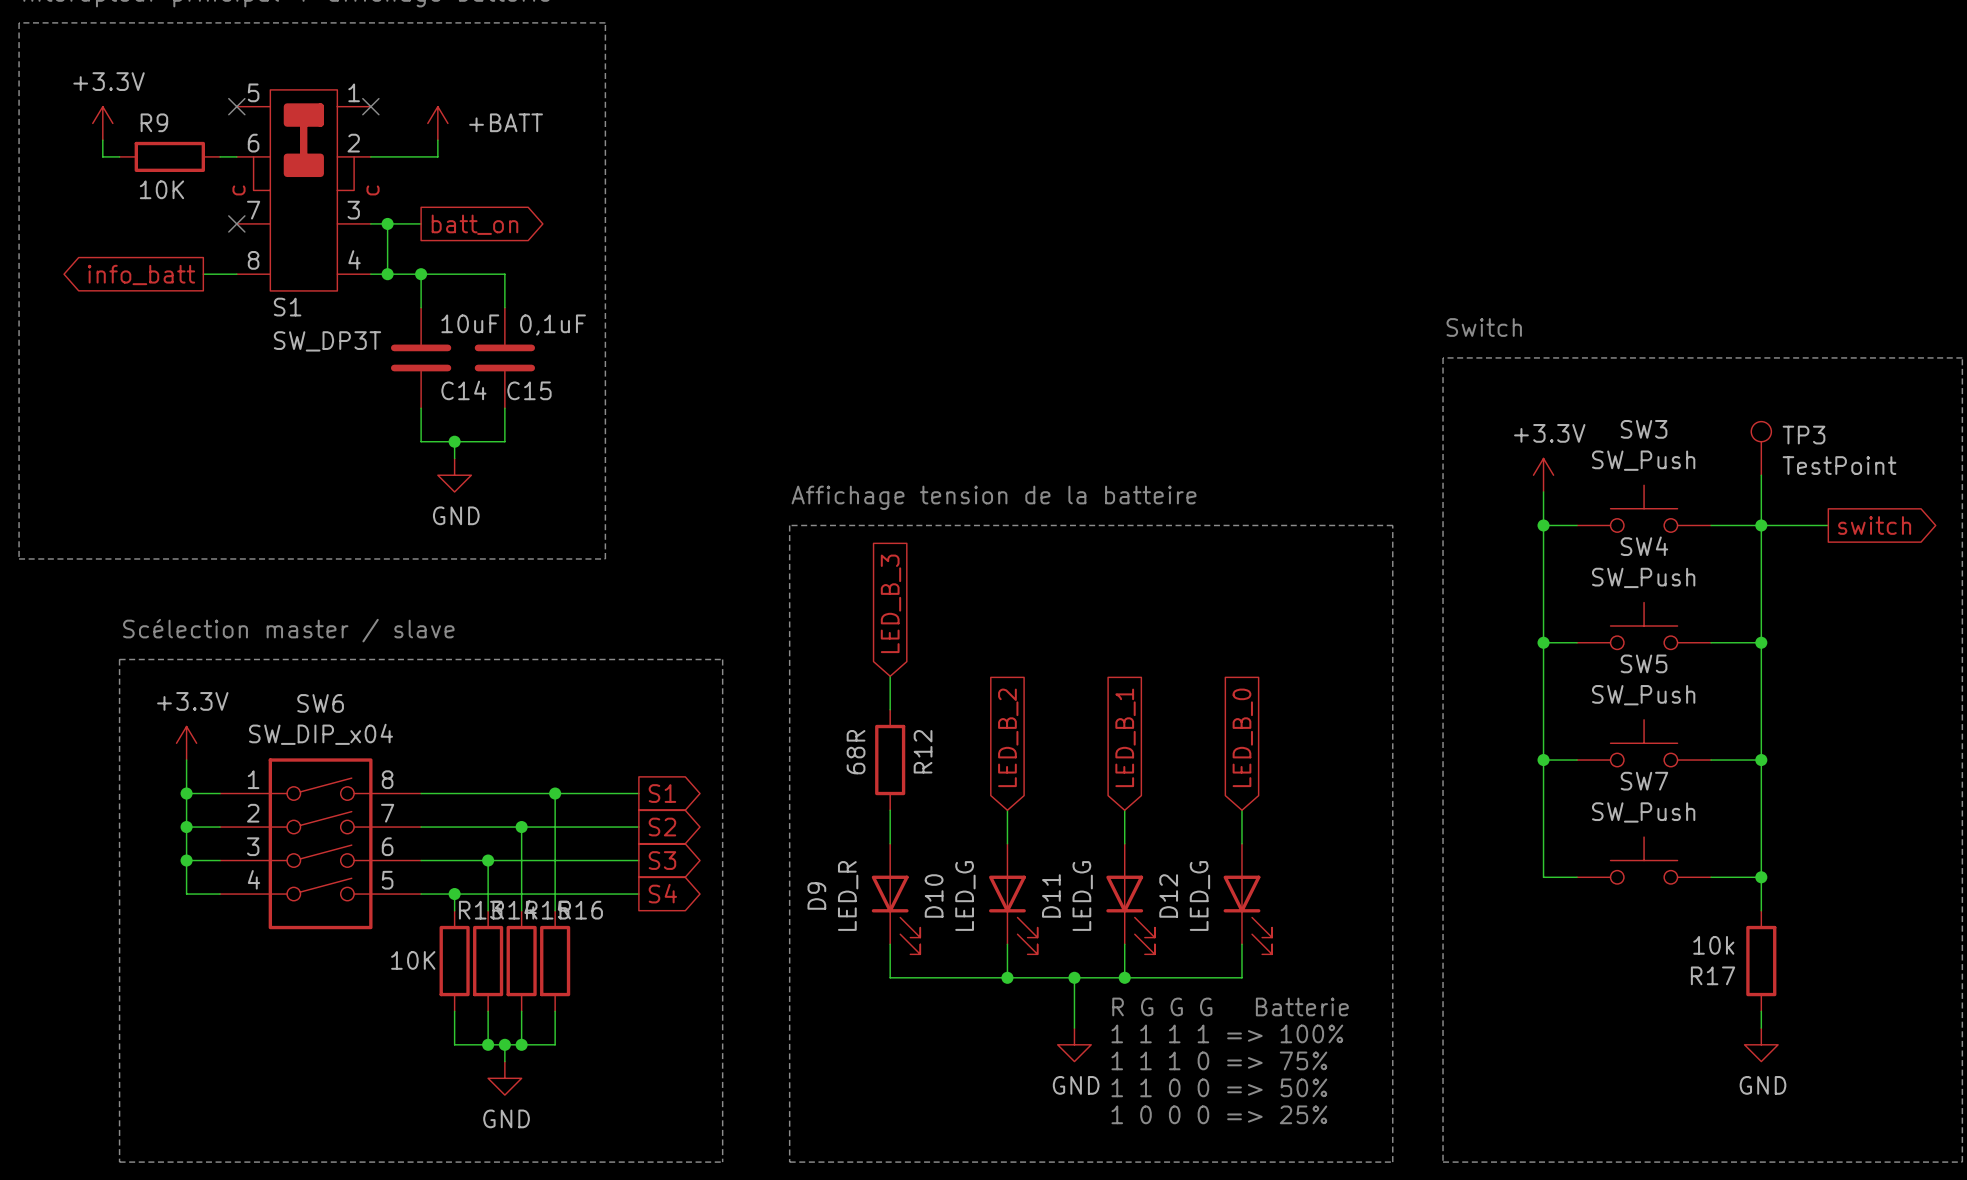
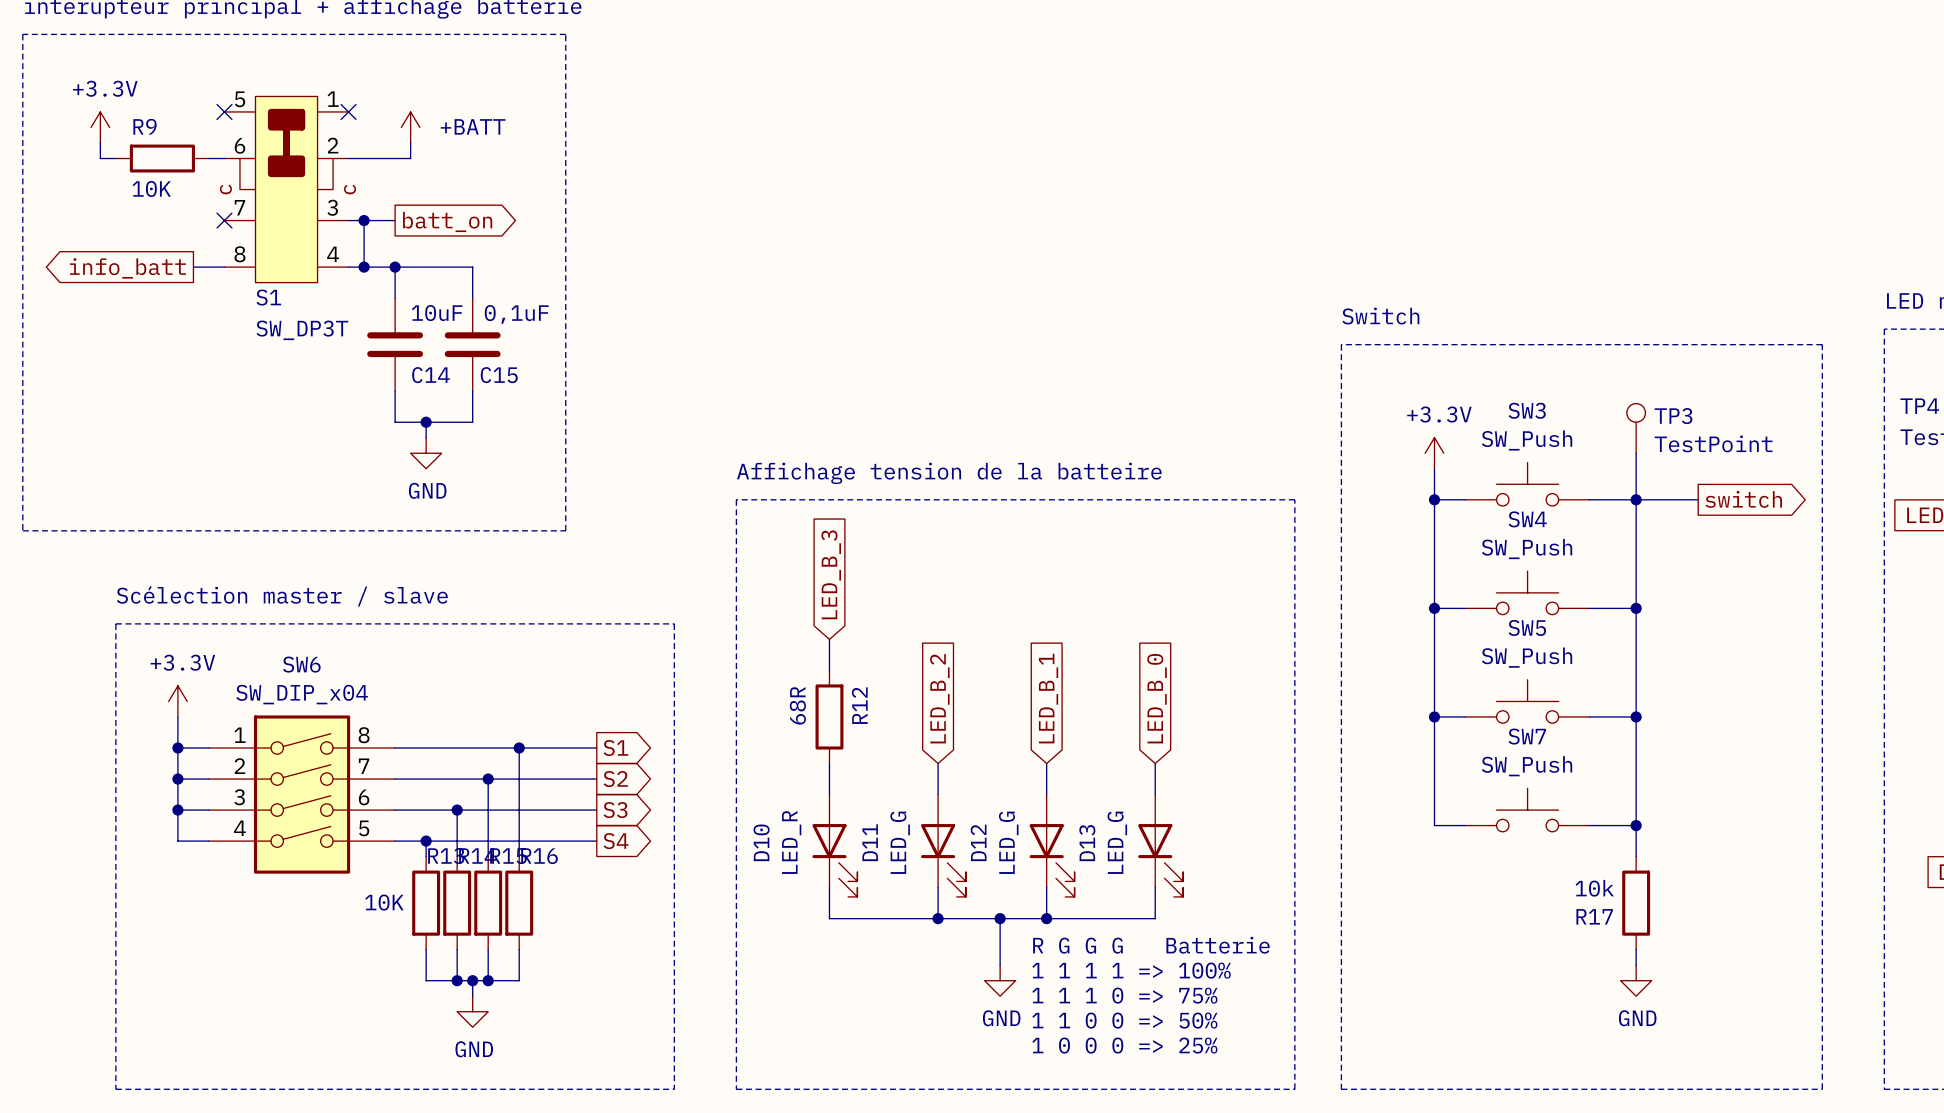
D9 name: D9 (816, 895) -> D10 (761, 842)
D10 name: D10 (934, 895) -> D11 (870, 842)
D11 name: D11 (1051, 895) -> D12 (978, 842)
D12 name: D12 (1168, 895) -> D13 (1087, 843)

